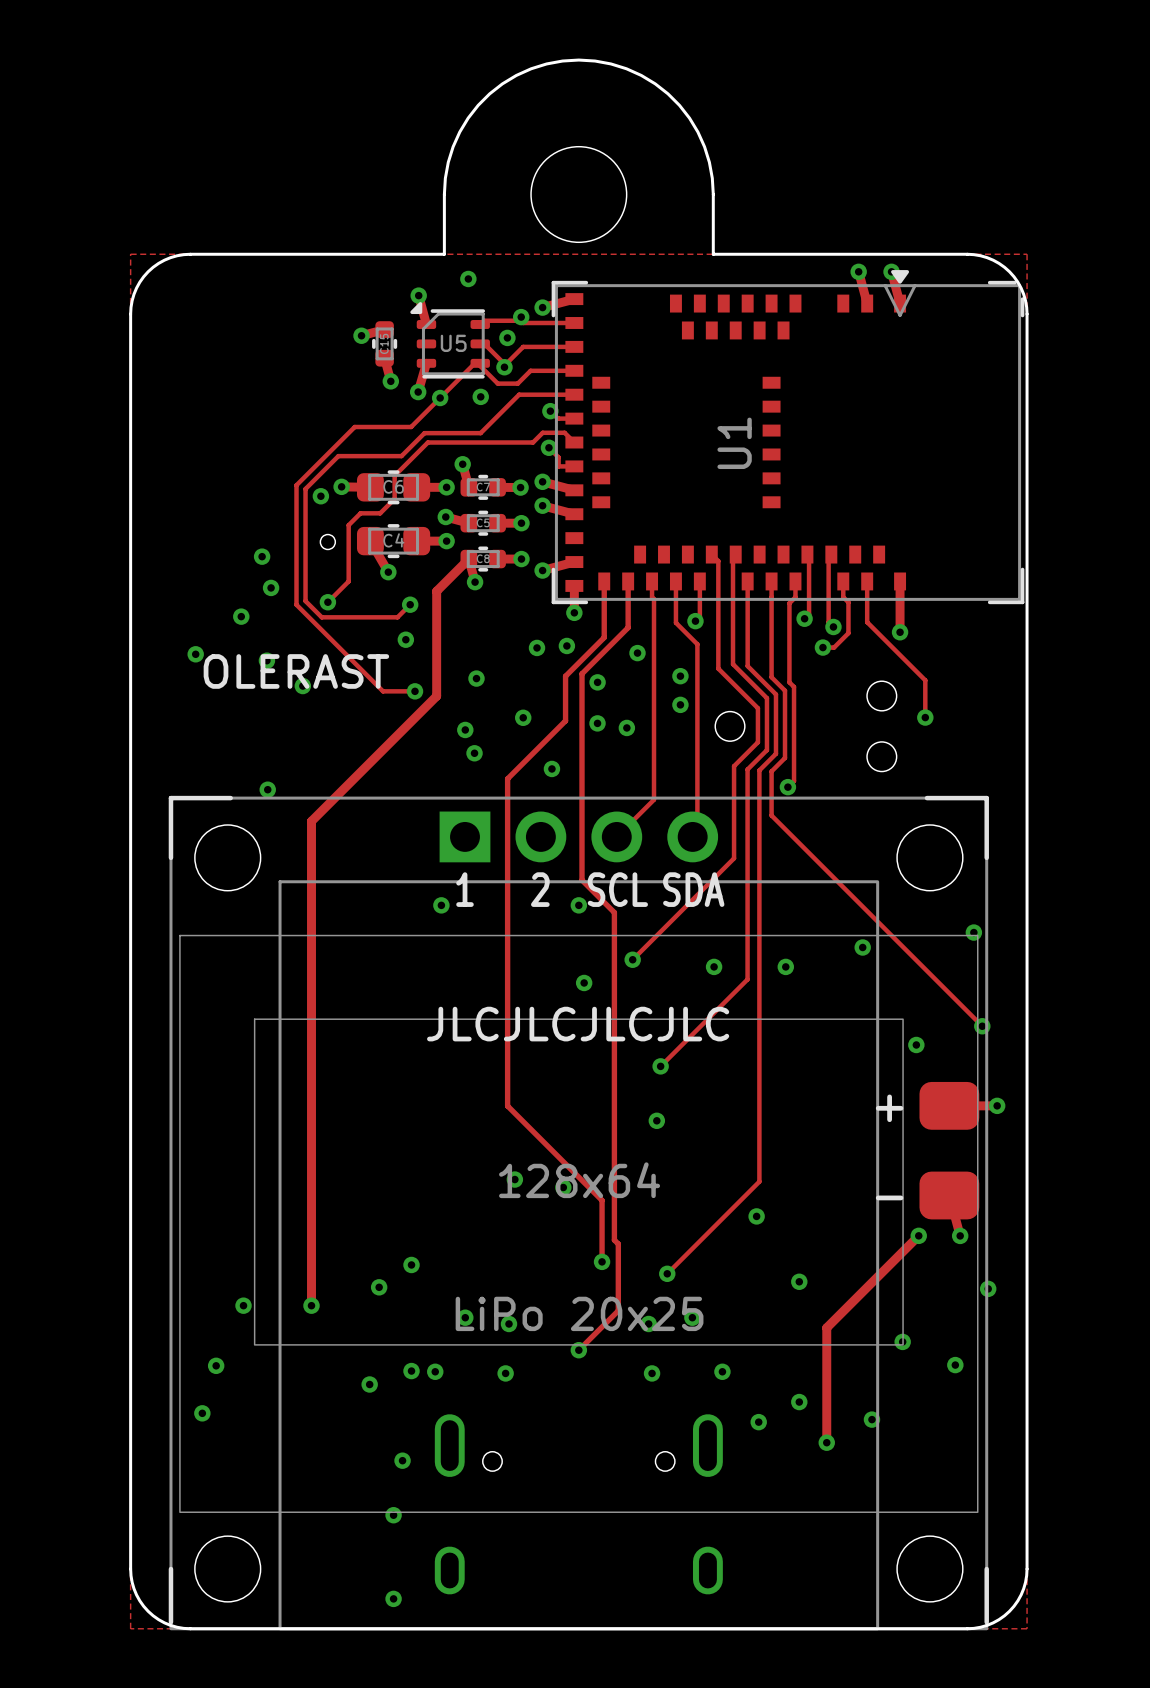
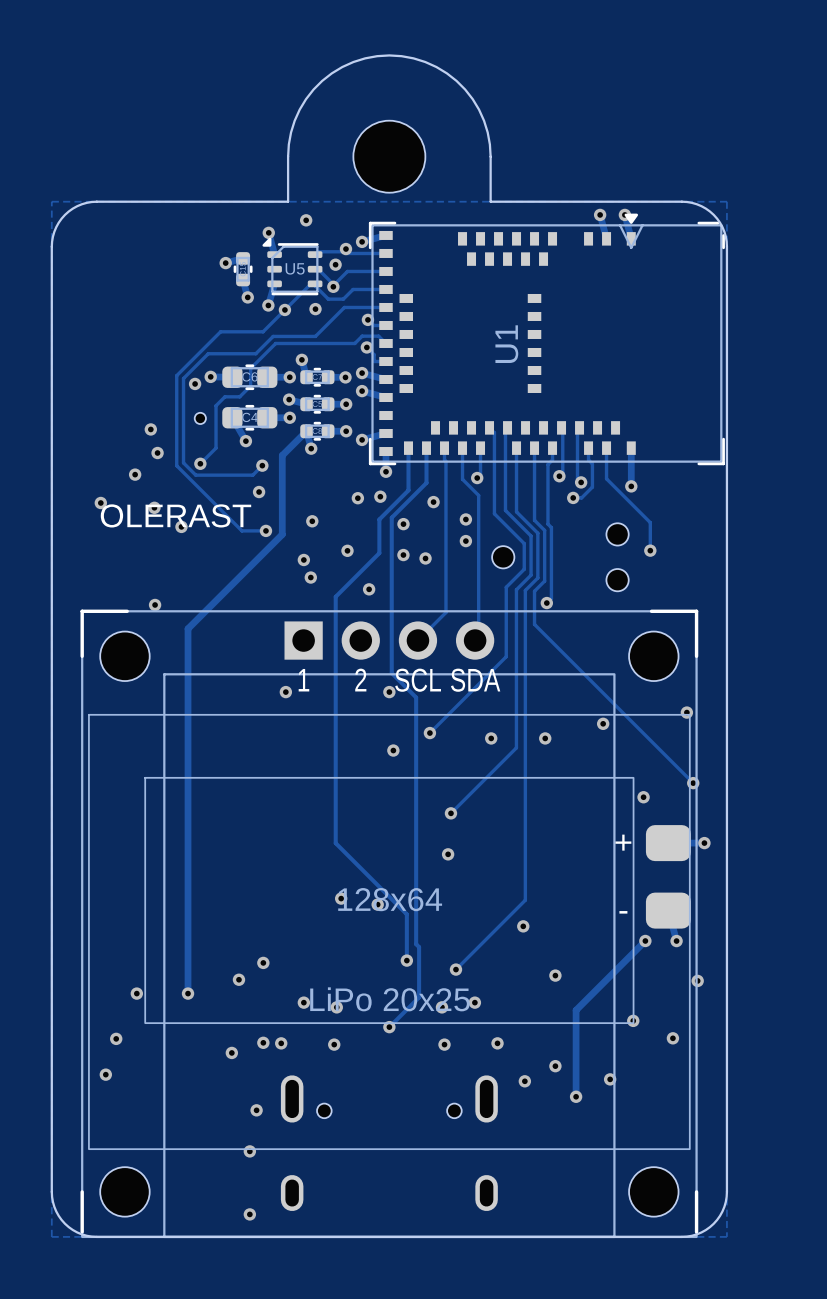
text: JLCJLCJLCJLC (578, 1024) -> none

